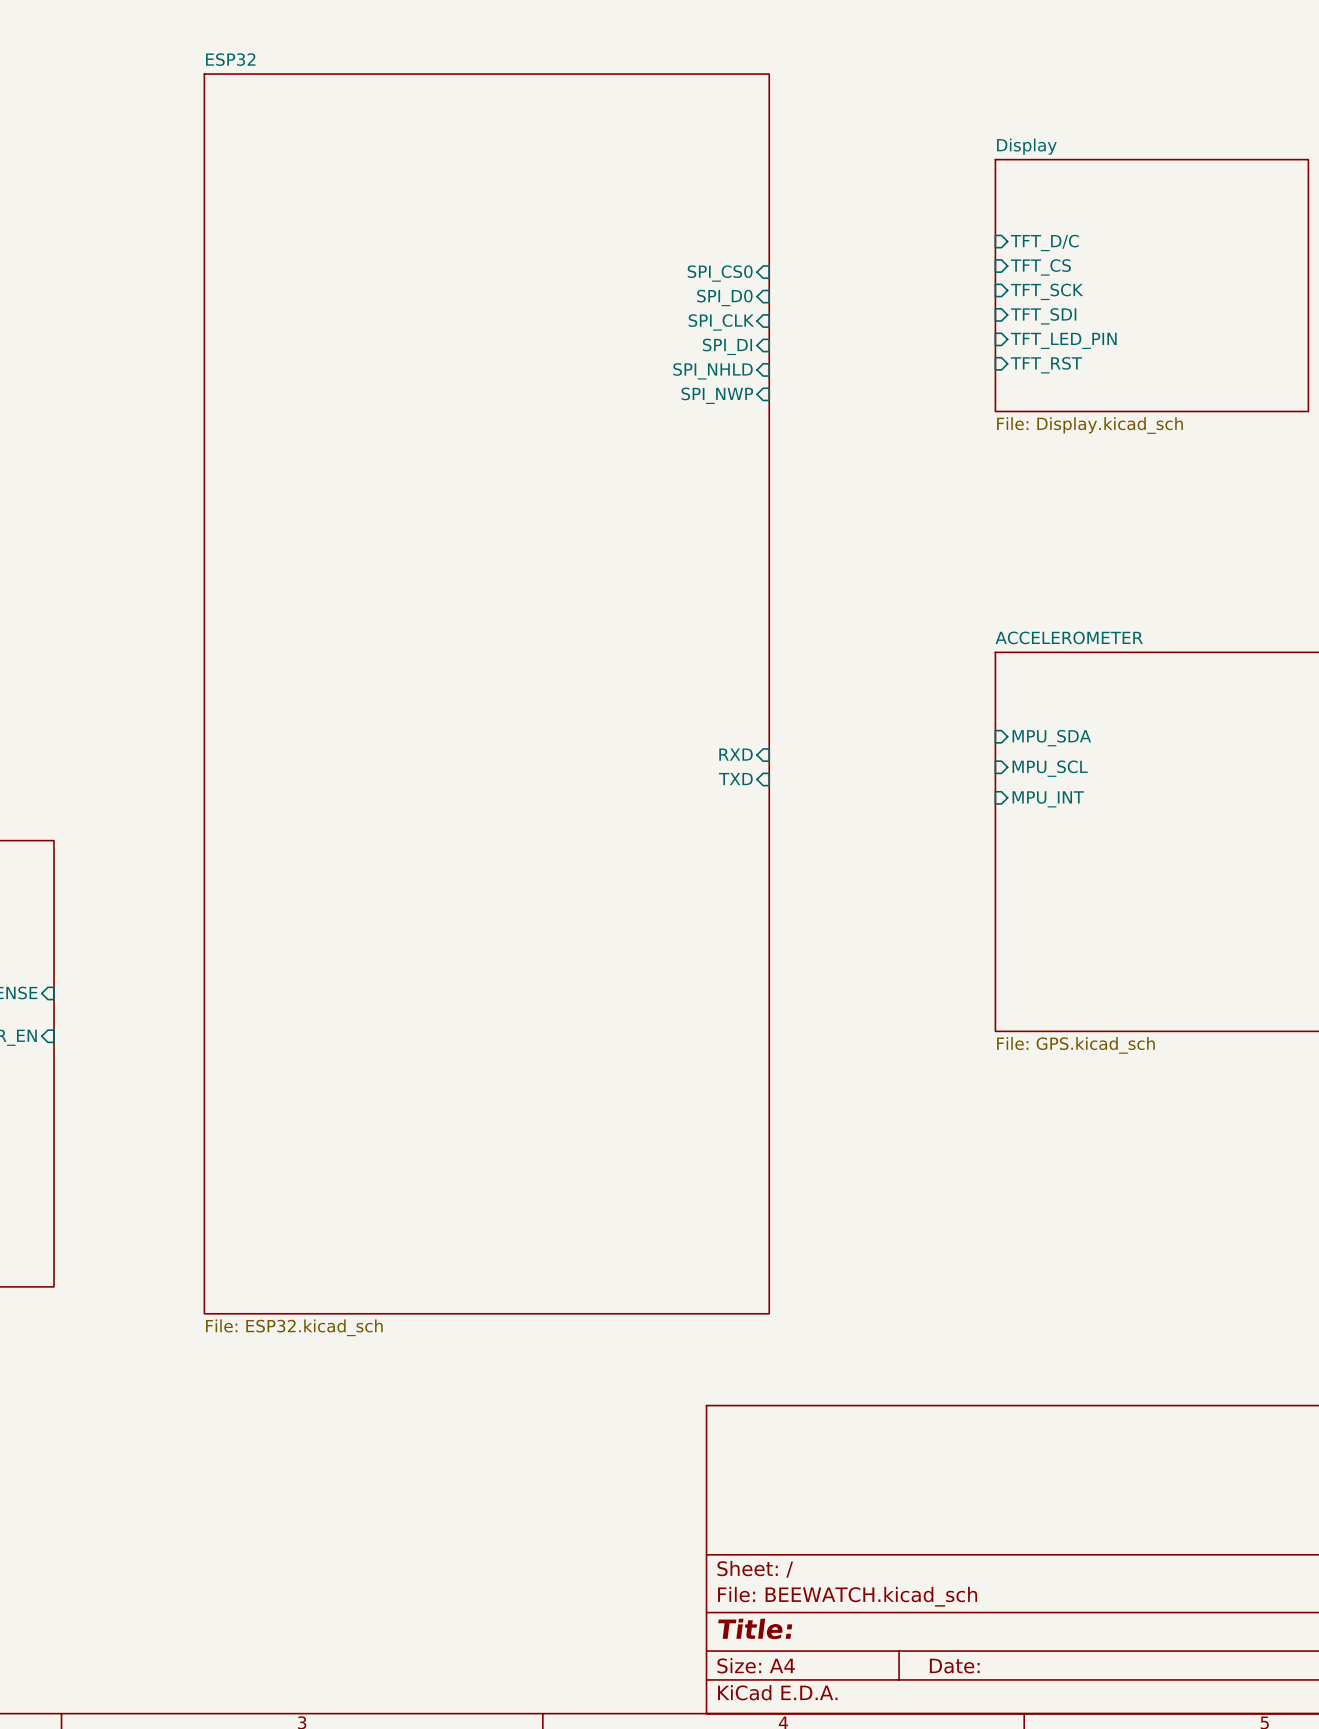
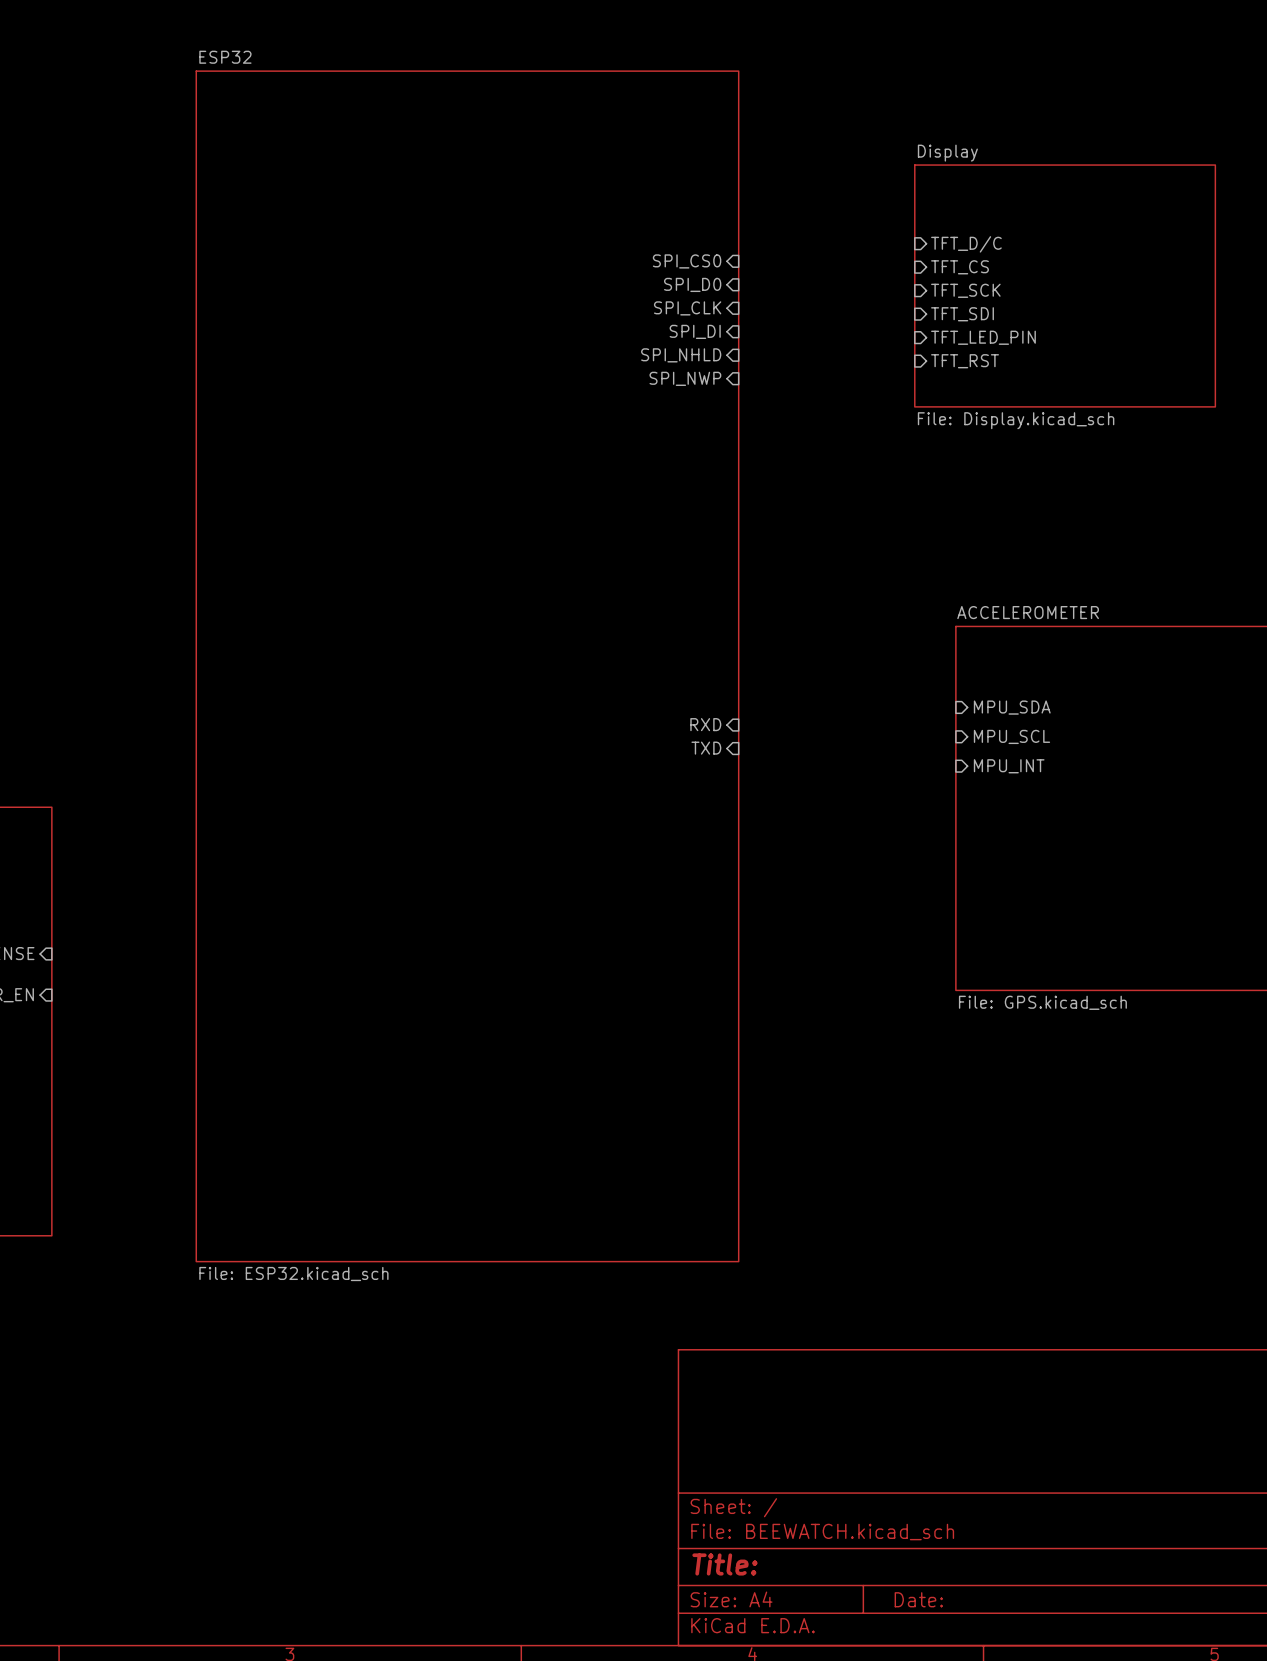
sheet pin position: TFT_D/C (1044, 242) -> TFT_D/C (966, 244)
sheet pin position: TFT_CS (1040, 267) -> TFT_CS (959, 267)
sheet Display position: (1151, 285) -> (1065, 285)
sheet pin position: TFT_SCK (1047, 291) -> TFT_SCK (965, 290)
sheet pin position: TFT_SDI (1043, 316) -> TFT_SDI (962, 314)
sheet pin position: TFT_LED_PIN (1063, 340) -> TFT_LED_PIN (983, 337)
sheet pin position: TFT_RST (1046, 365) -> TFT_RST (965, 361)

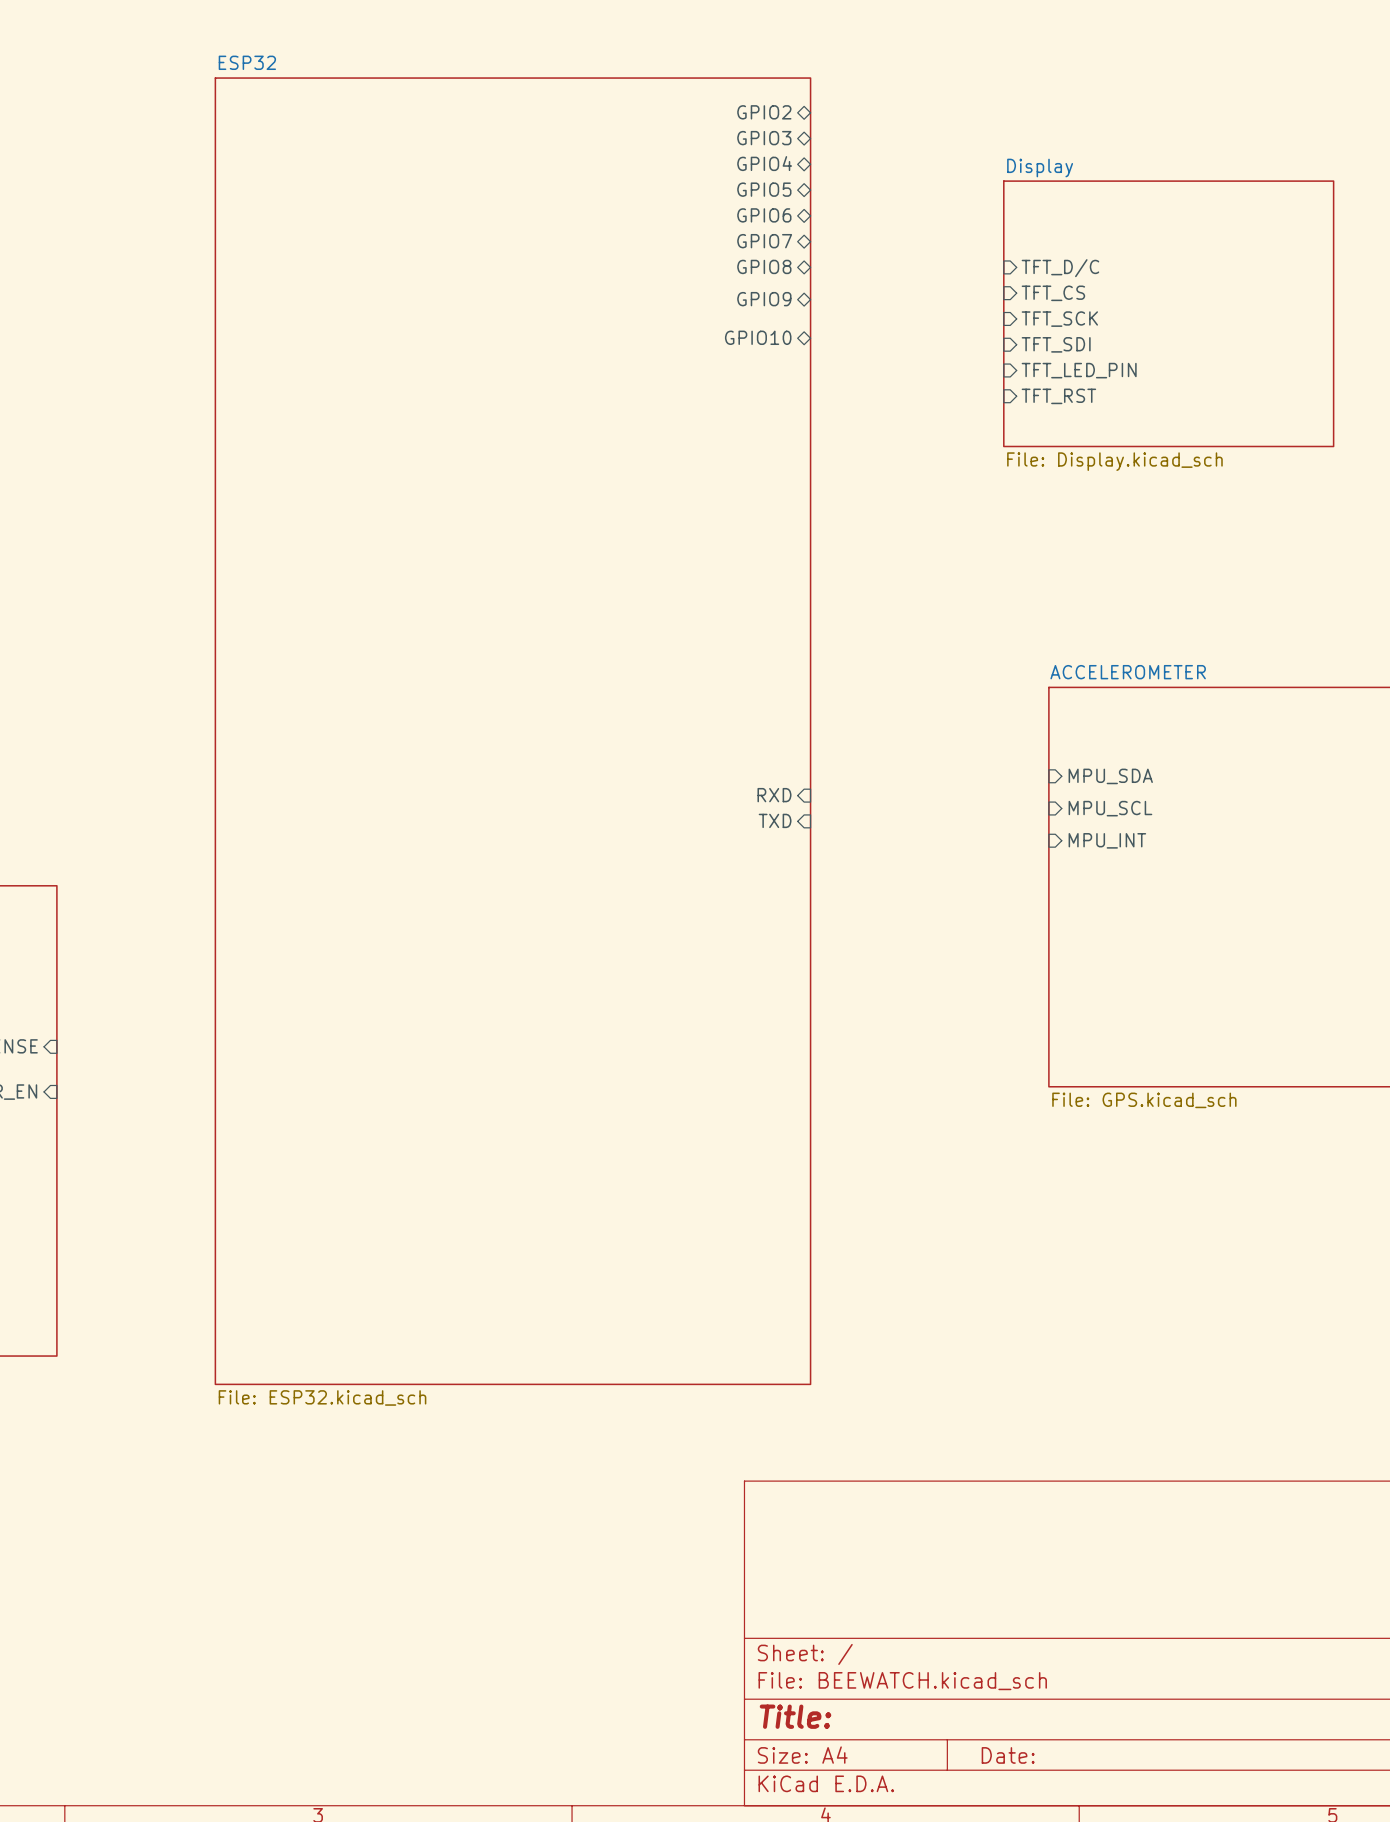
sheet pin: none -> GPIO2 (764, 112)
sheet pin: none -> GPIO3 (764, 138)
sheet pin: none -> GPIO4 (764, 163)
sheet pin: none -> GPIO5 (764, 189)
sheet pin: none -> GPIO6 (764, 215)
sheet pin: none -> GPIO7 (764, 241)
sheet pin: none -> GPIO8 (764, 266)
sheet pin: SPI_CS0 (687, 261) -> none
sheet pin: none -> GPIO9 (764, 299)
sheet pin: SPI_D0 (692, 284) -> none
sheet pin shape: input (687, 308) -> bidirectional (758, 337)
sheet pin: SPI_CLK (687, 308) -> GPIO10 (758, 337)
sheet pin: SPI_DI (695, 331) -> none
sheet pin: SPI_NHLD (681, 355) -> none
sheet pin: SPI_NWP (685, 378) -> none

